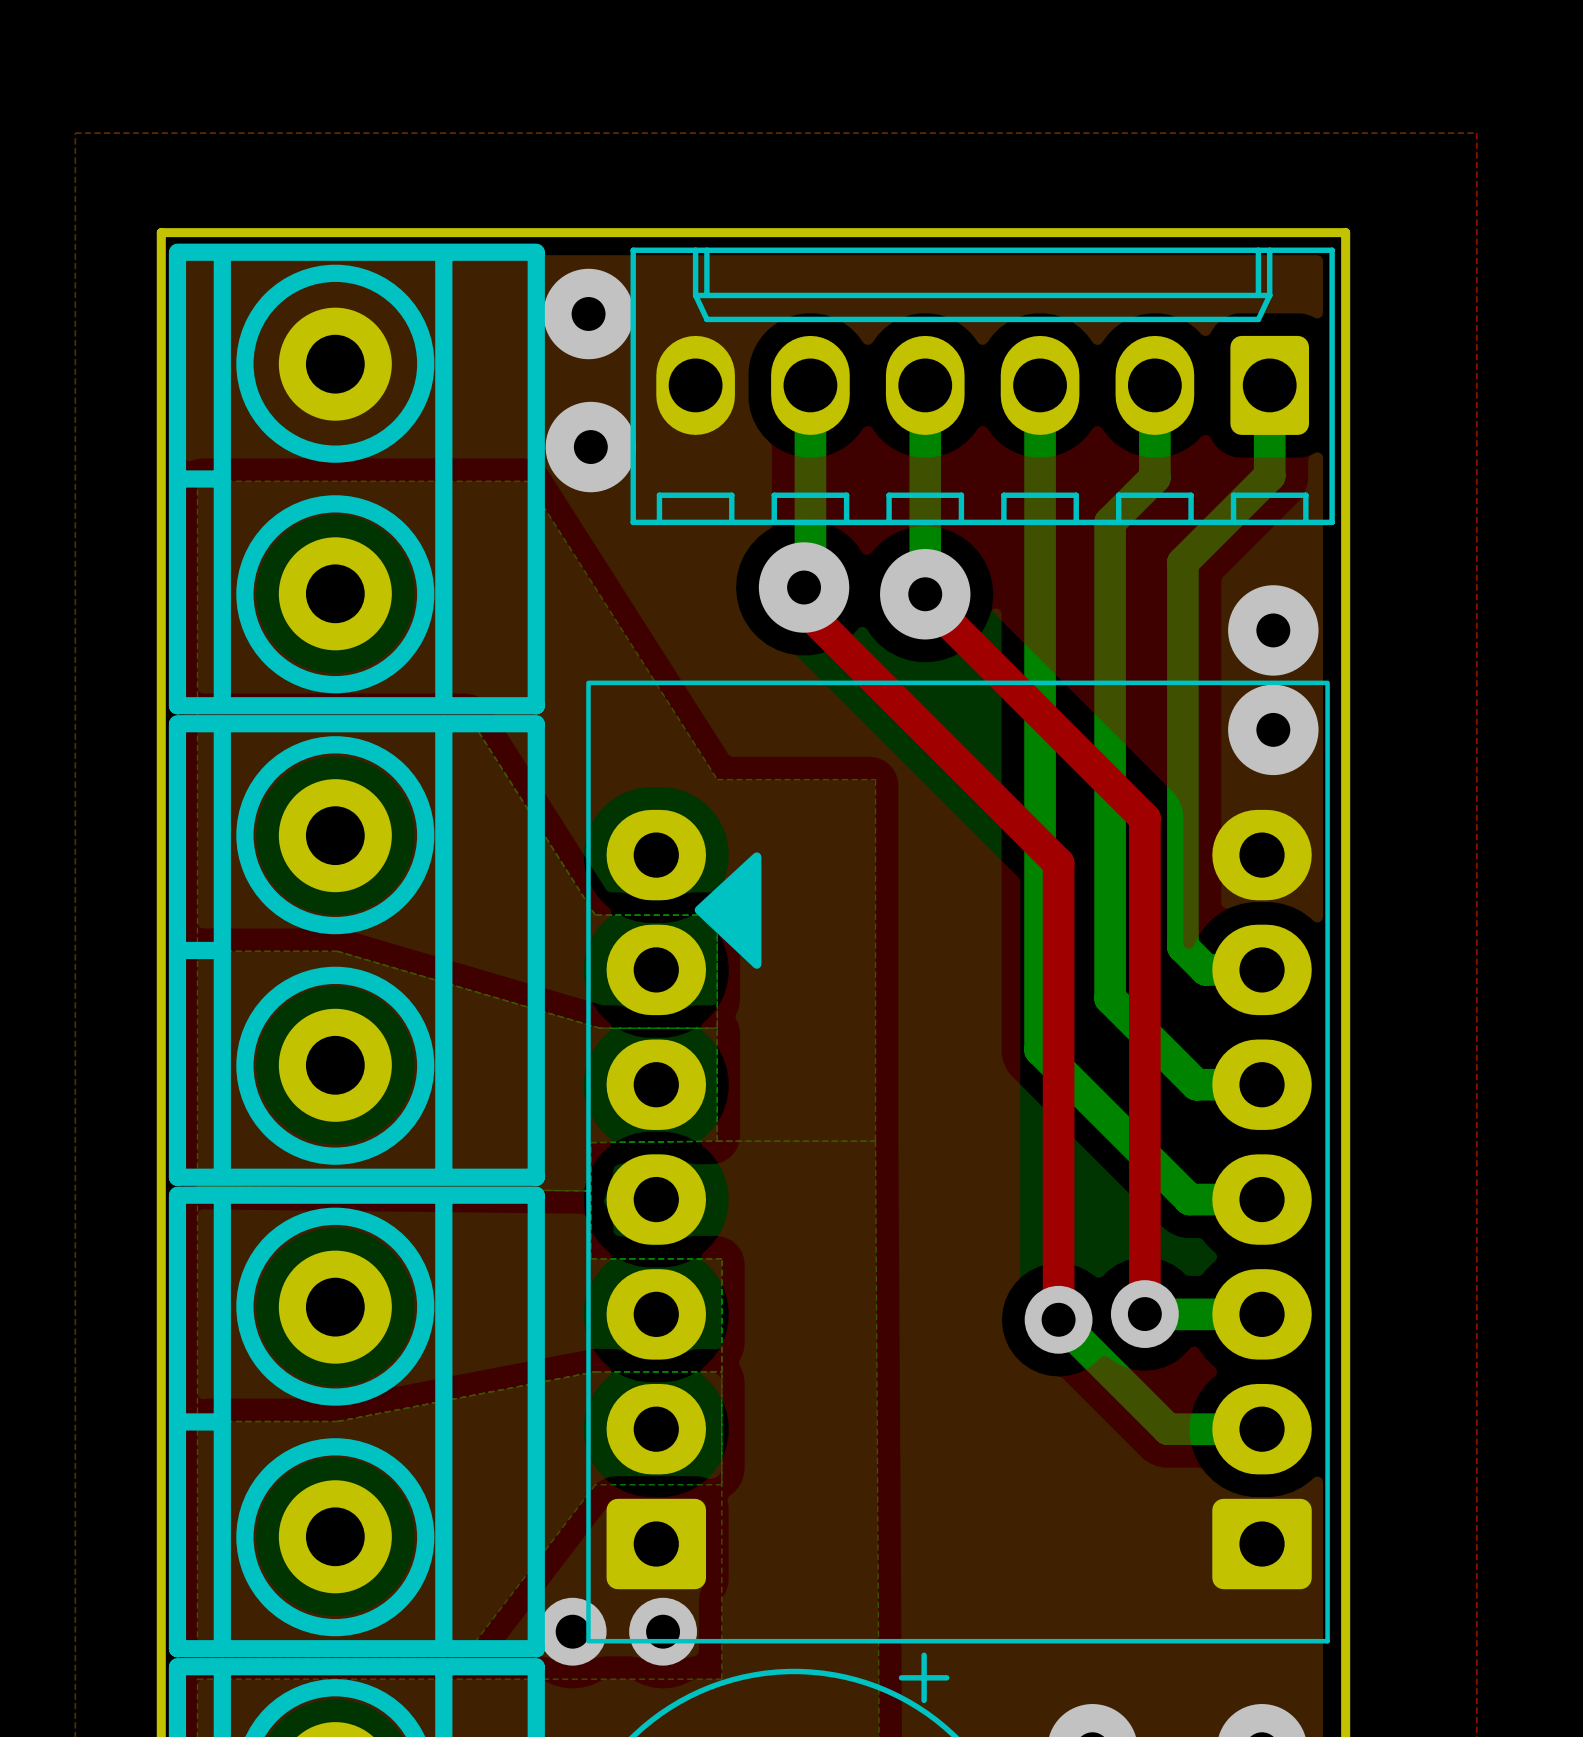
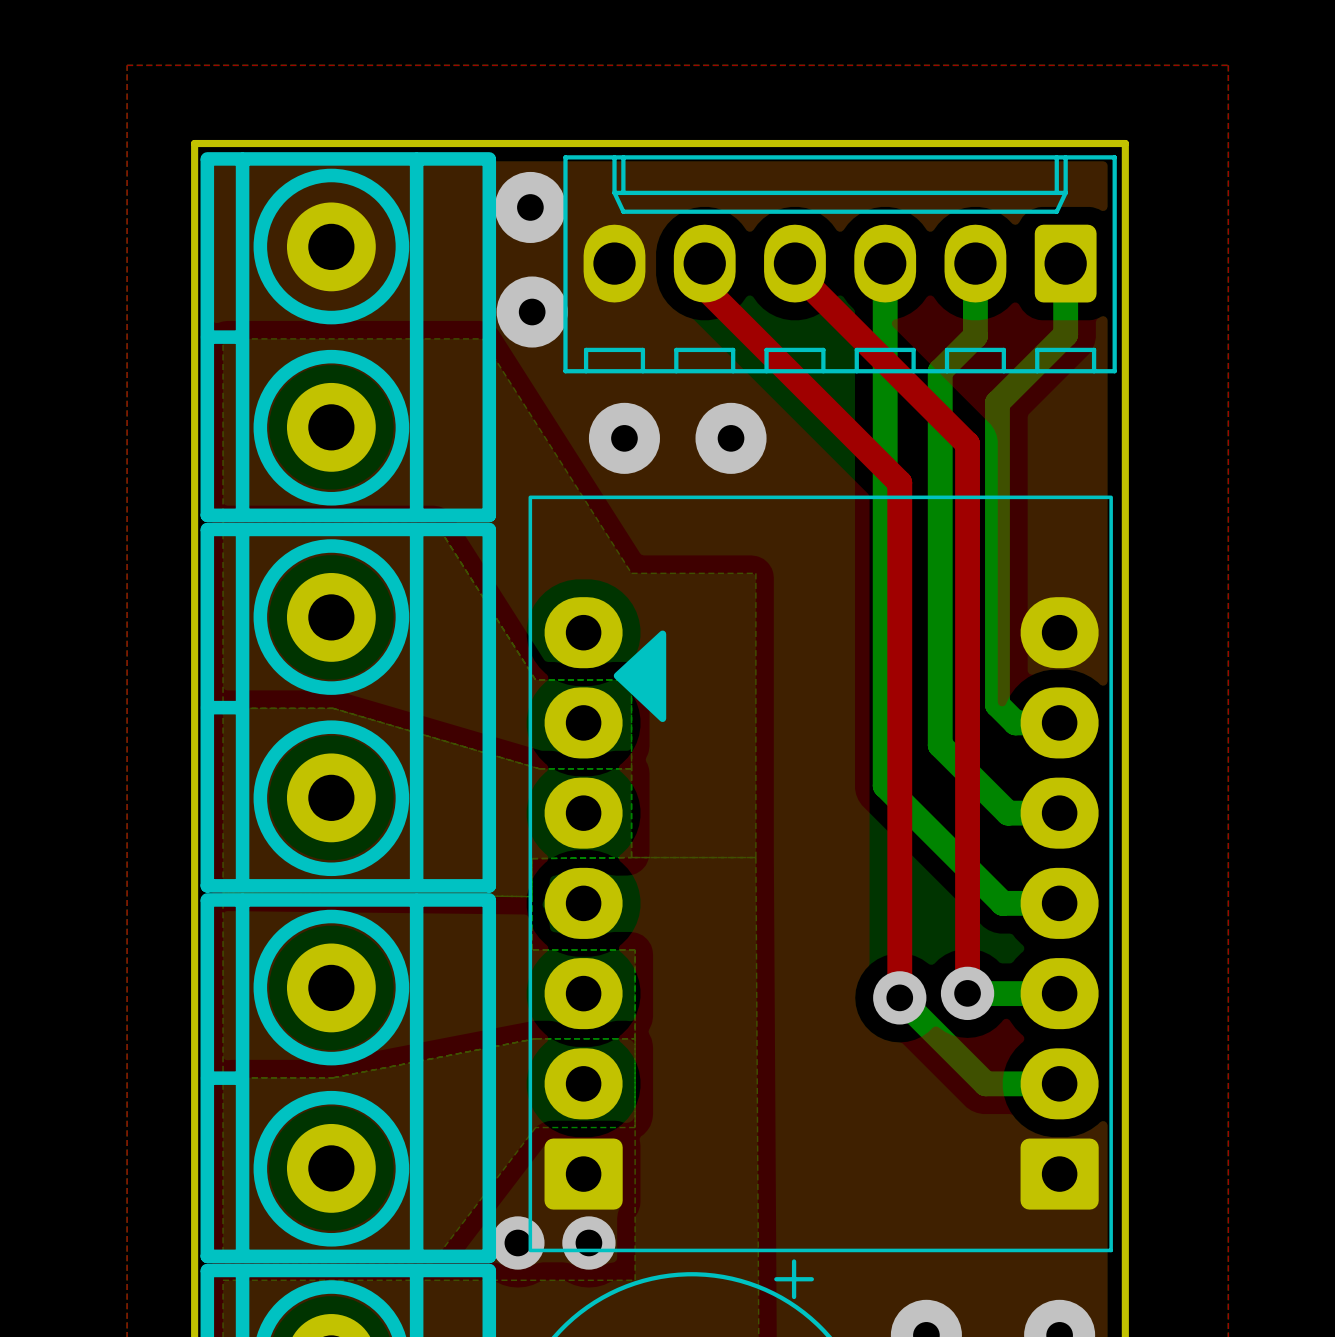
bottom track: (810, 385) (810, 581) (804, 587) -> none
bottom track: (925, 385) (925, 594) -> none
top track: (804, 587) (804, 608) (1058, 863) -> (704, 263) (704, 287) (899, 482) (899, 639)
via: (804, 587) -> none
top track: (925, 594) (925, 598) (1144, 818) -> (794, 263) (794, 271) (967, 443) (967, 603)
via: (925, 594) -> none
via: none -> (624, 438)
via: none -> (731, 438)
via: (1273, 630) -> none
via: (1273, 729) -> none

